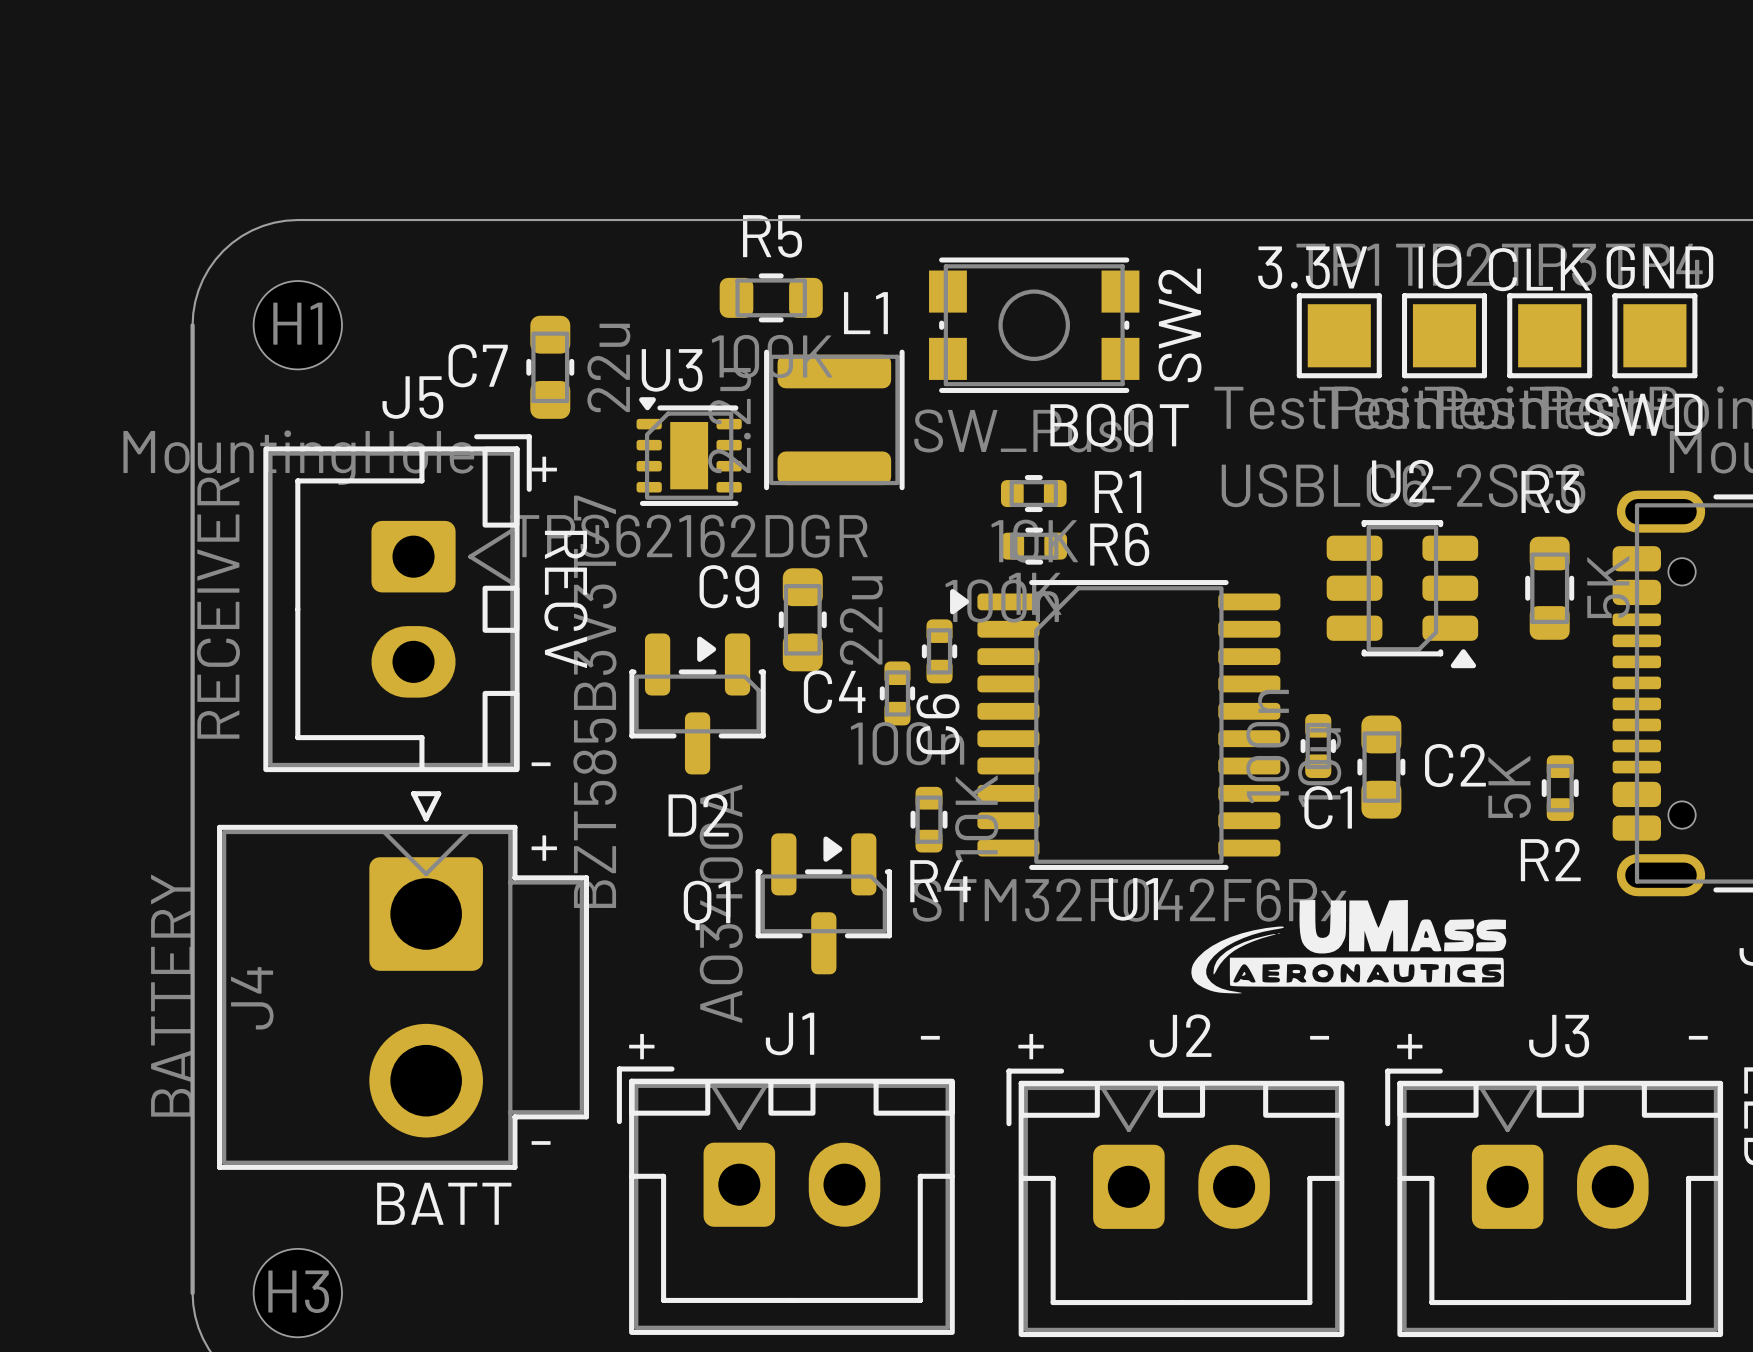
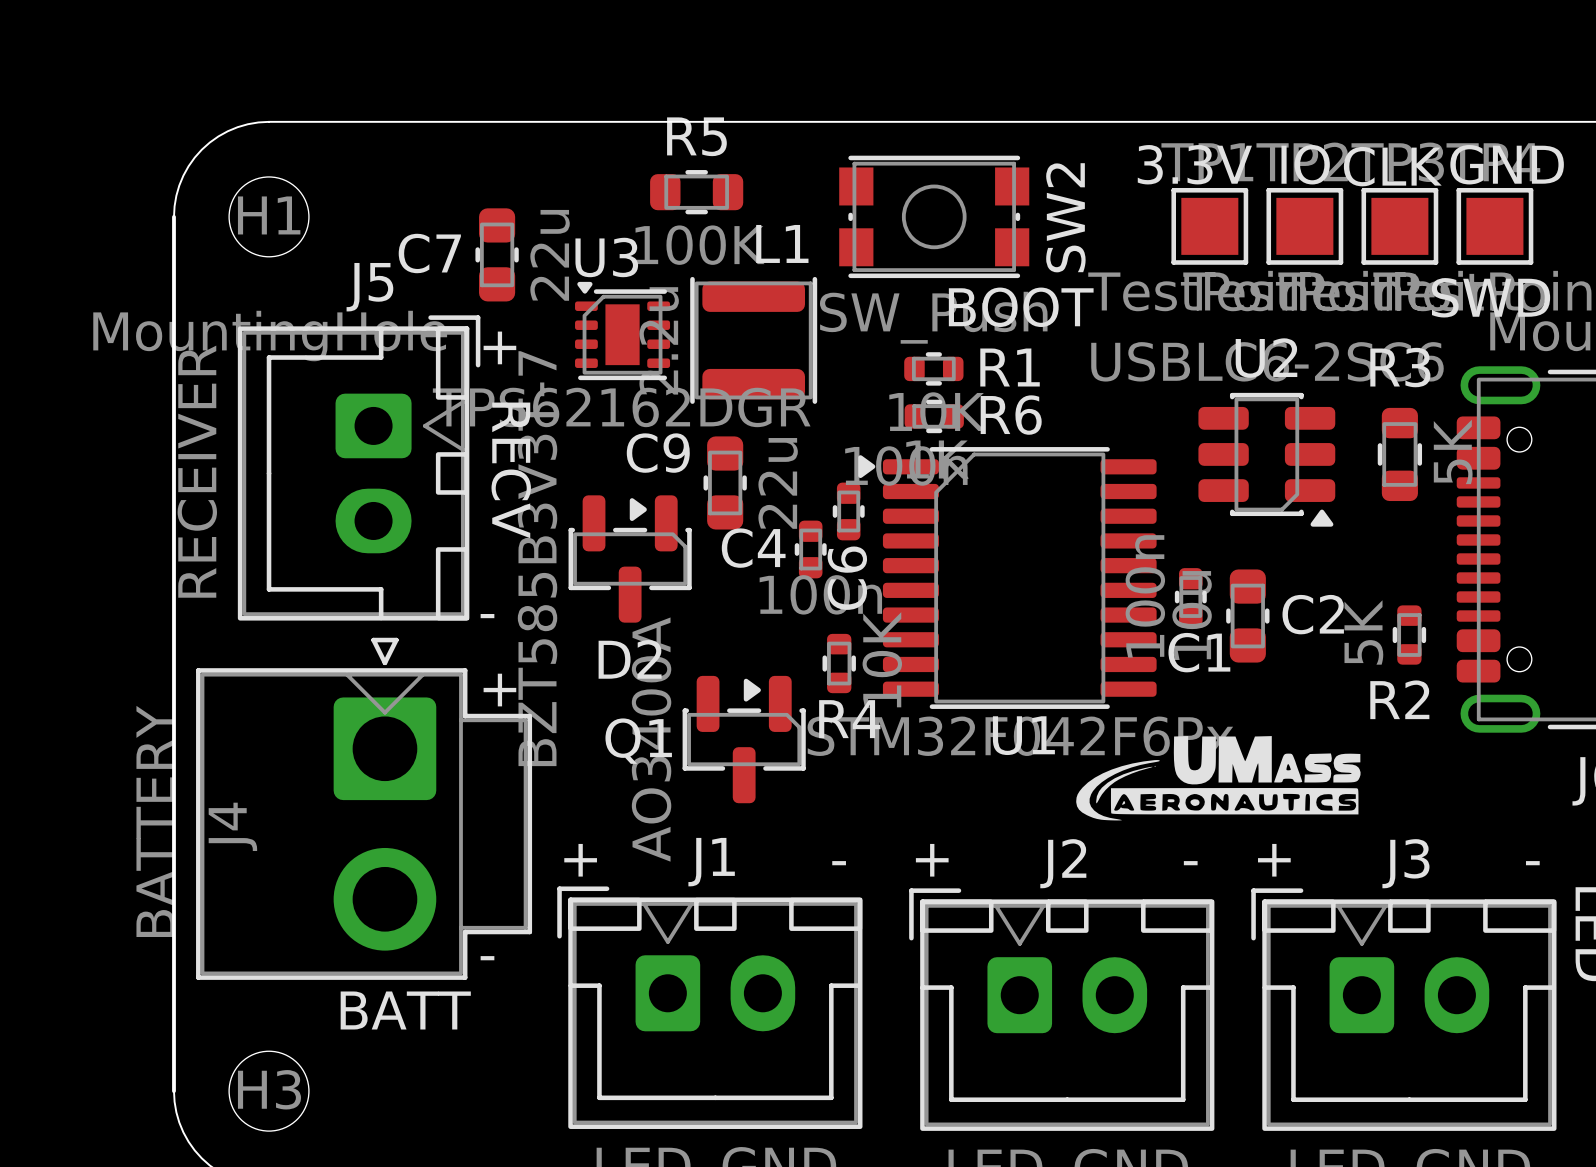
L1 position: (834, 419) -> (753, 340)

